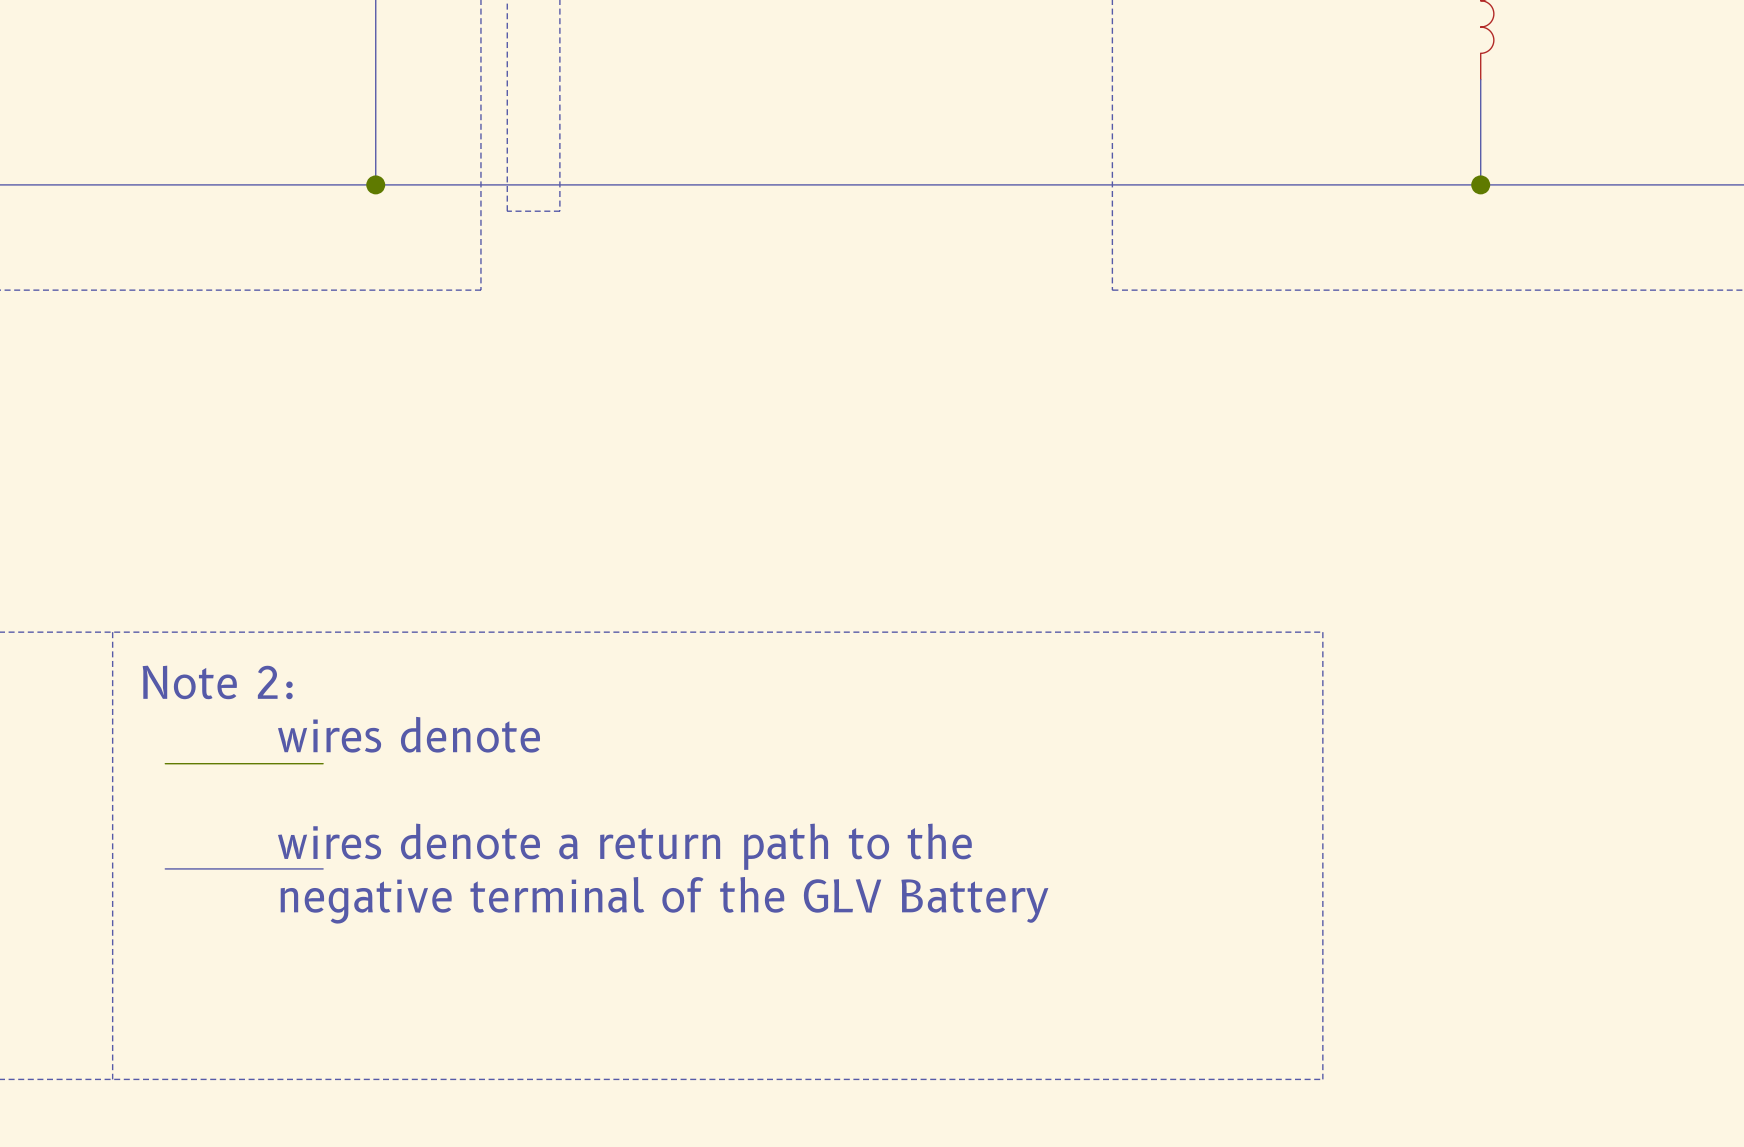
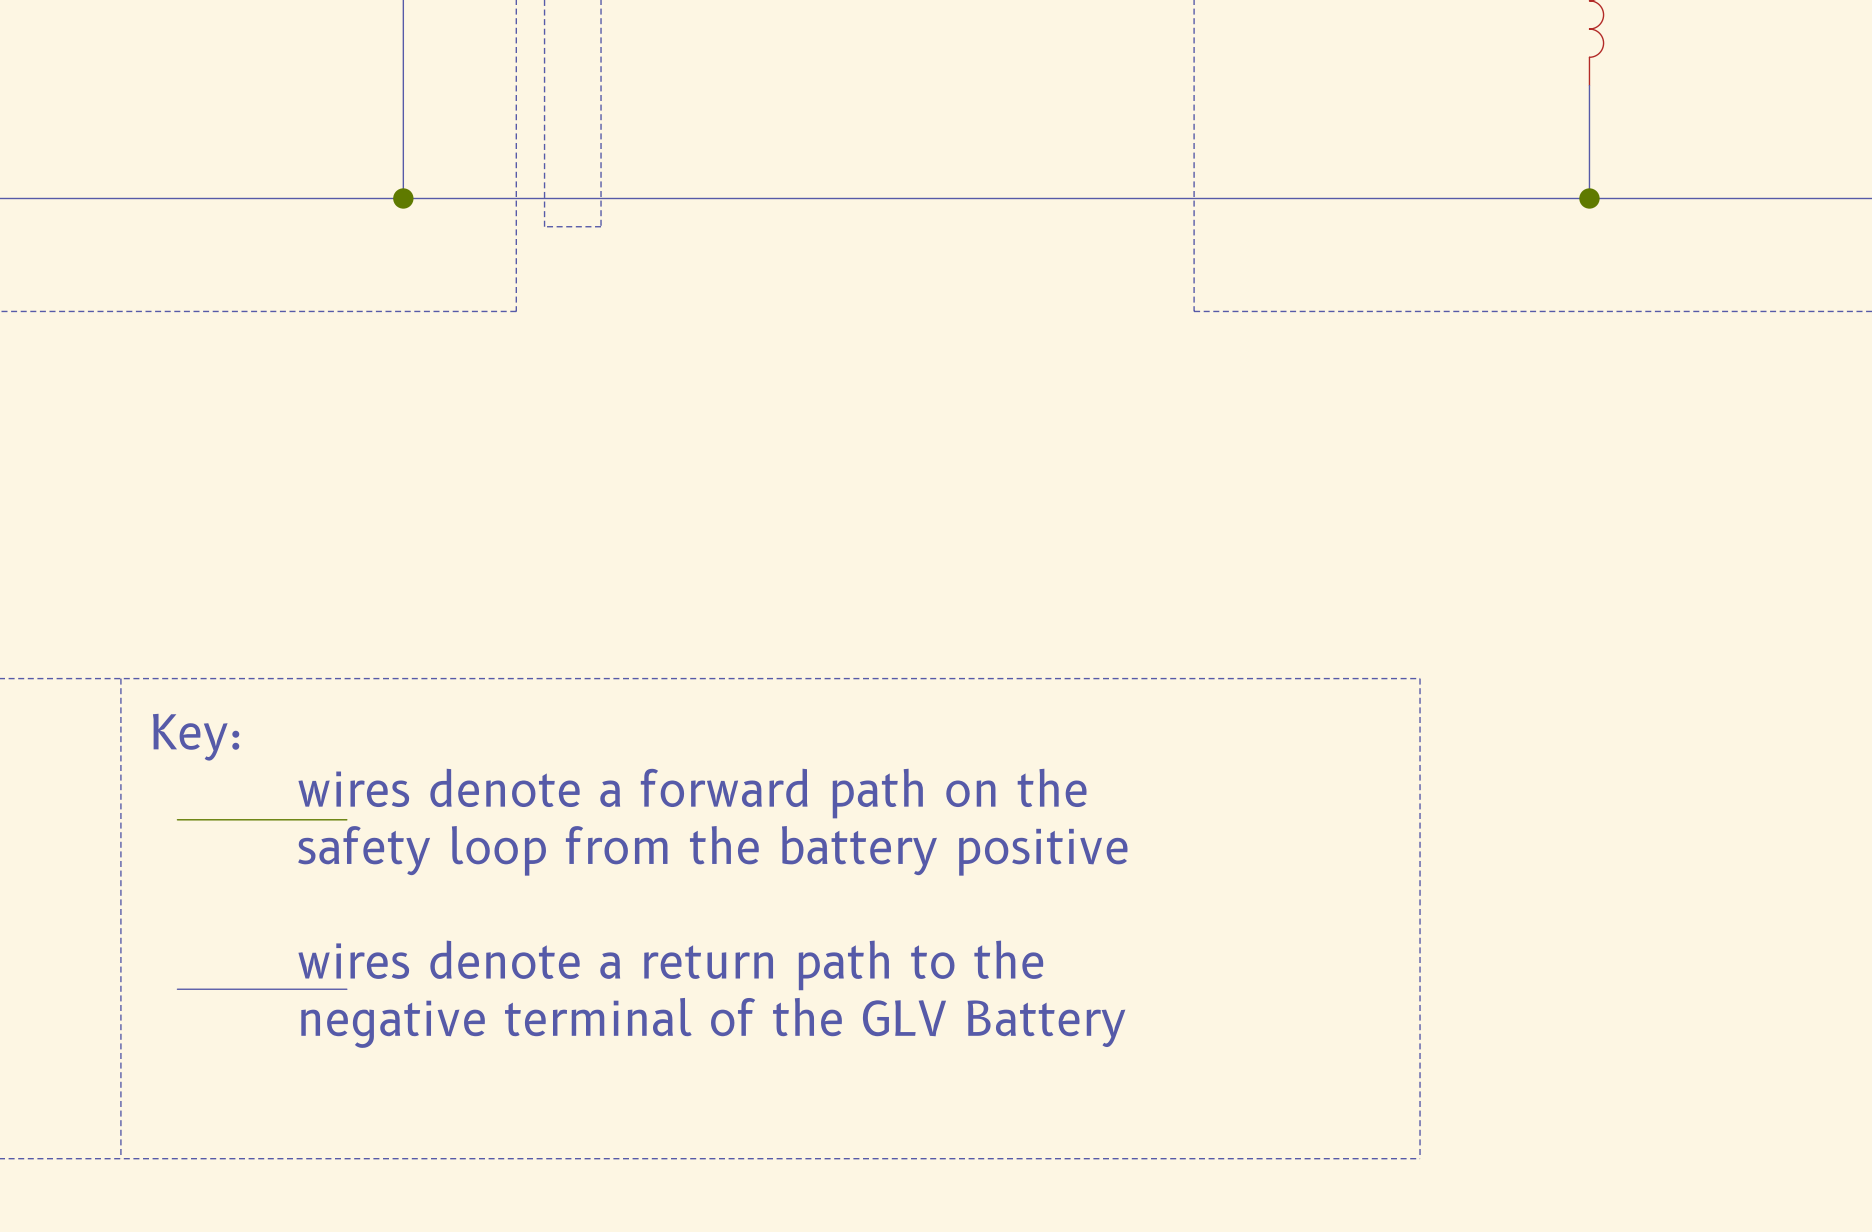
text: Note 2: (217, 682) -> Key: (196, 737)
text: wires denote (409, 734) -> wires denote a forward path on the (692, 793)
text: none -> safety loop from the battery positive (712, 850)
text: wires denote a return path to the (624, 846) -> none
bus: (165, 868) (323, 868) -> (177, 989) (346, 989)
text: negative terminal of the GLV Battery (664, 900) -> wires denote a return path to the (670, 965)
text: none -> negative terminal of the GLV Battery (713, 1022)

